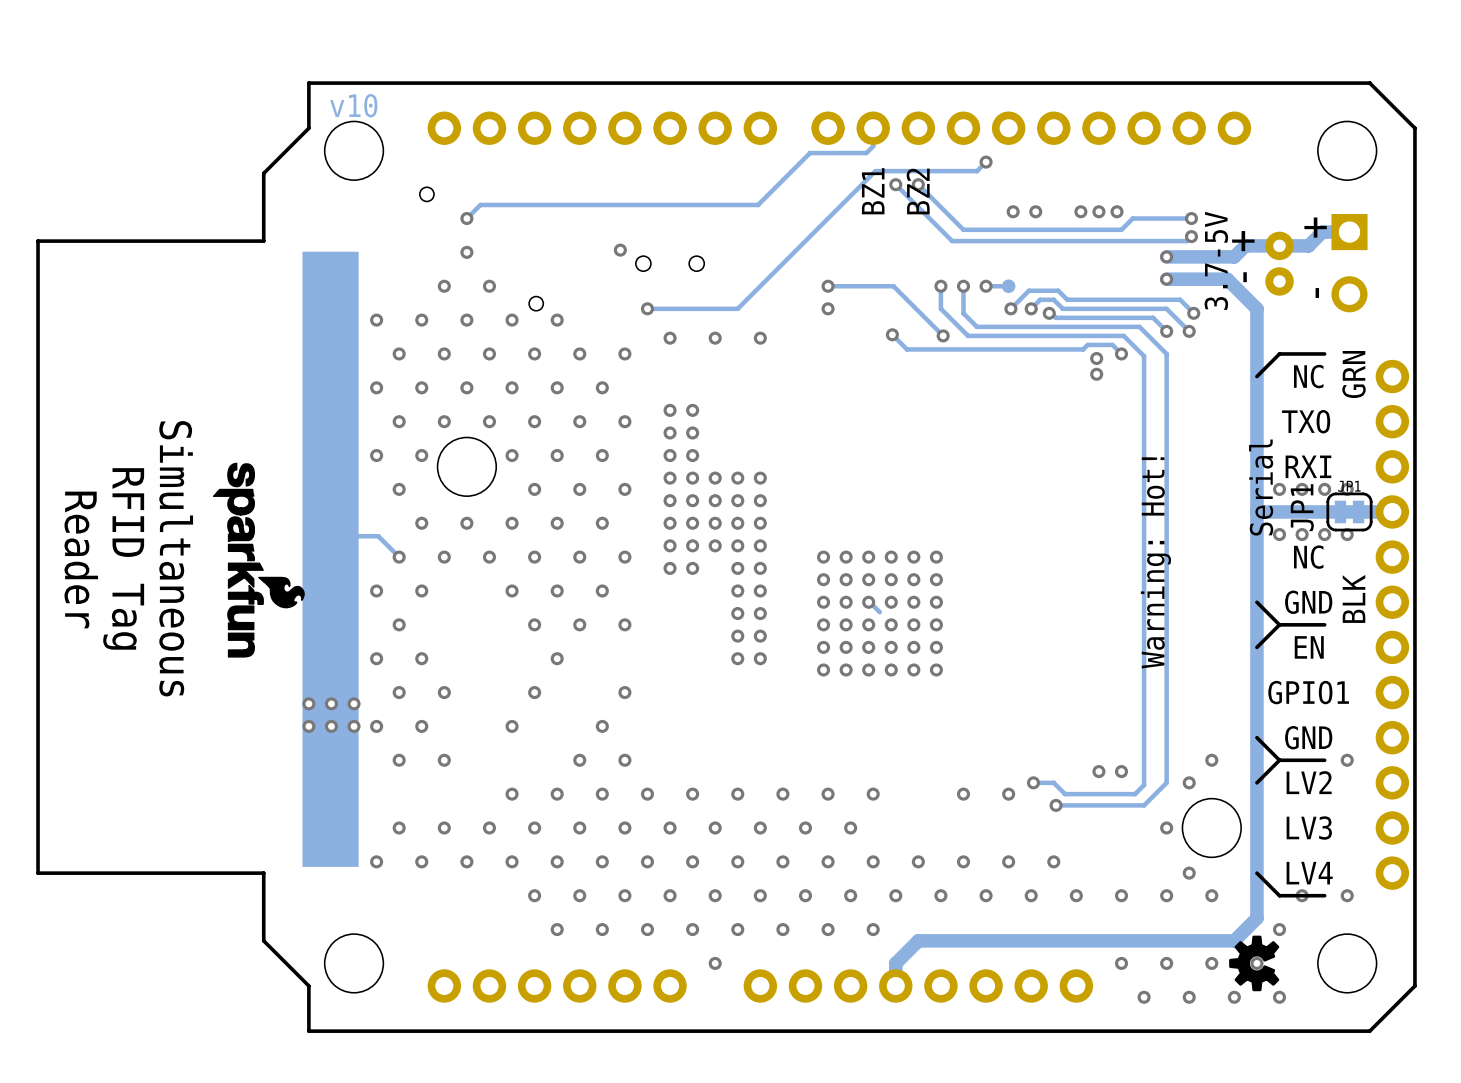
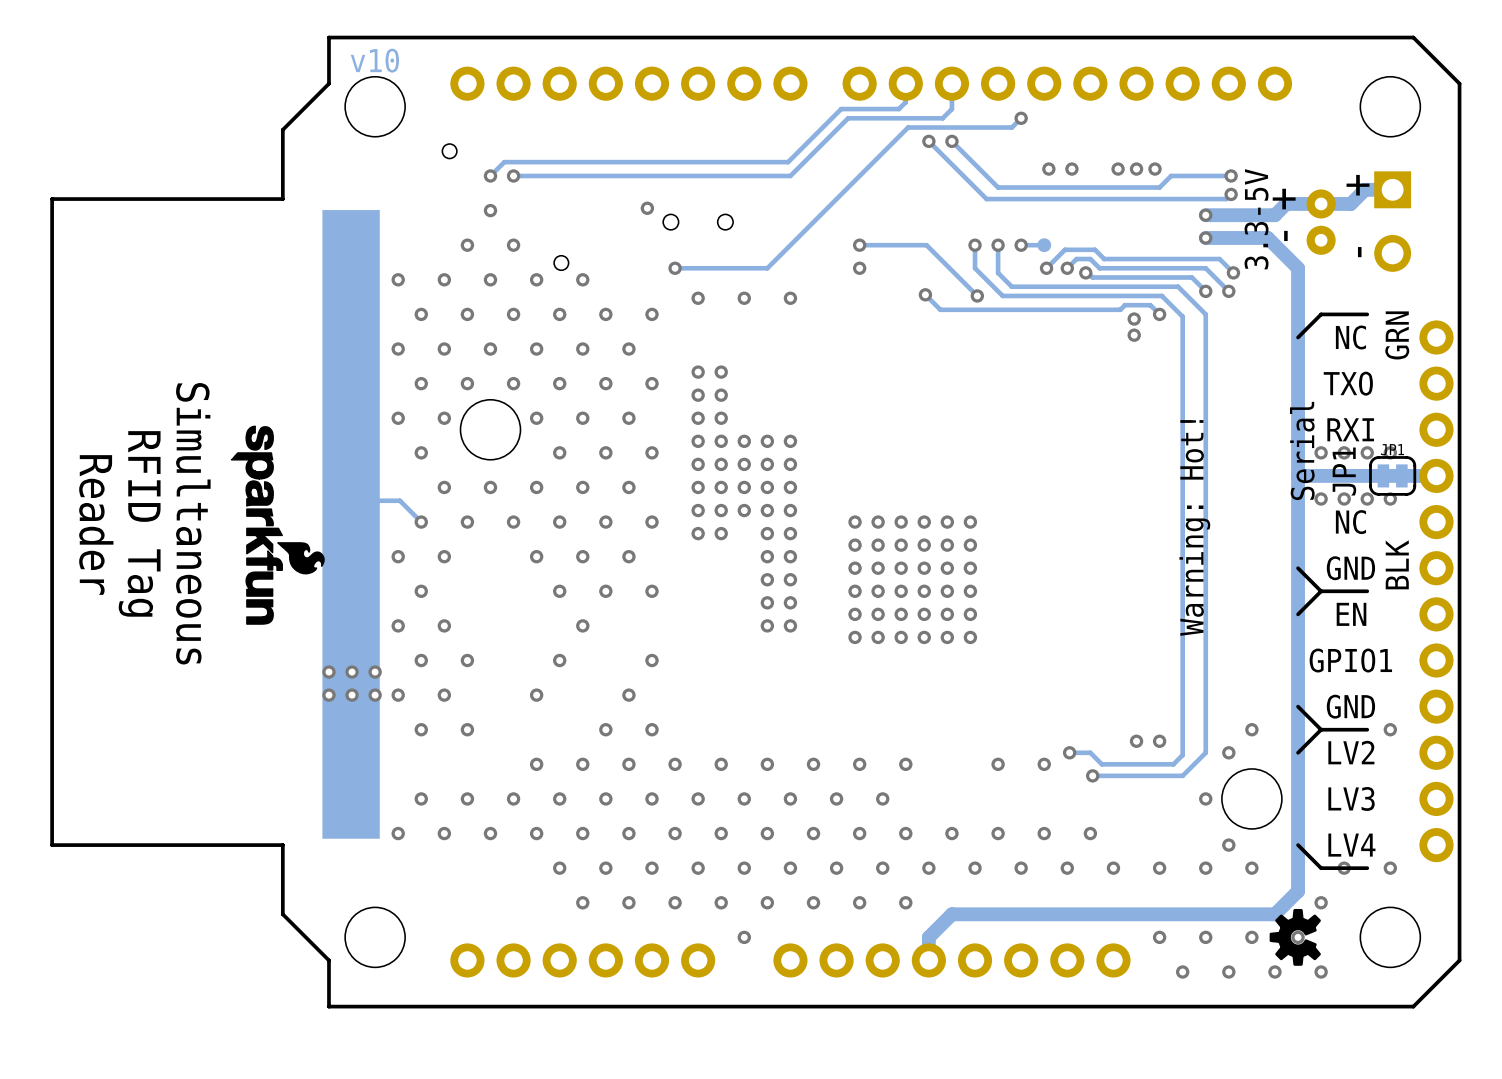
track: none -> (951, 83) (951, 109) (942, 118) (848, 118) (790, 175) (513, 175)
text: BZ1 (873, 191) -> none
text: BZ2 (918, 191) -> none
via: none -> (513, 175)
text: 3.7-5V (1216, 260) -> 3.3-5V (1256, 219)
track: (868, 602) (879, 612) -> none

